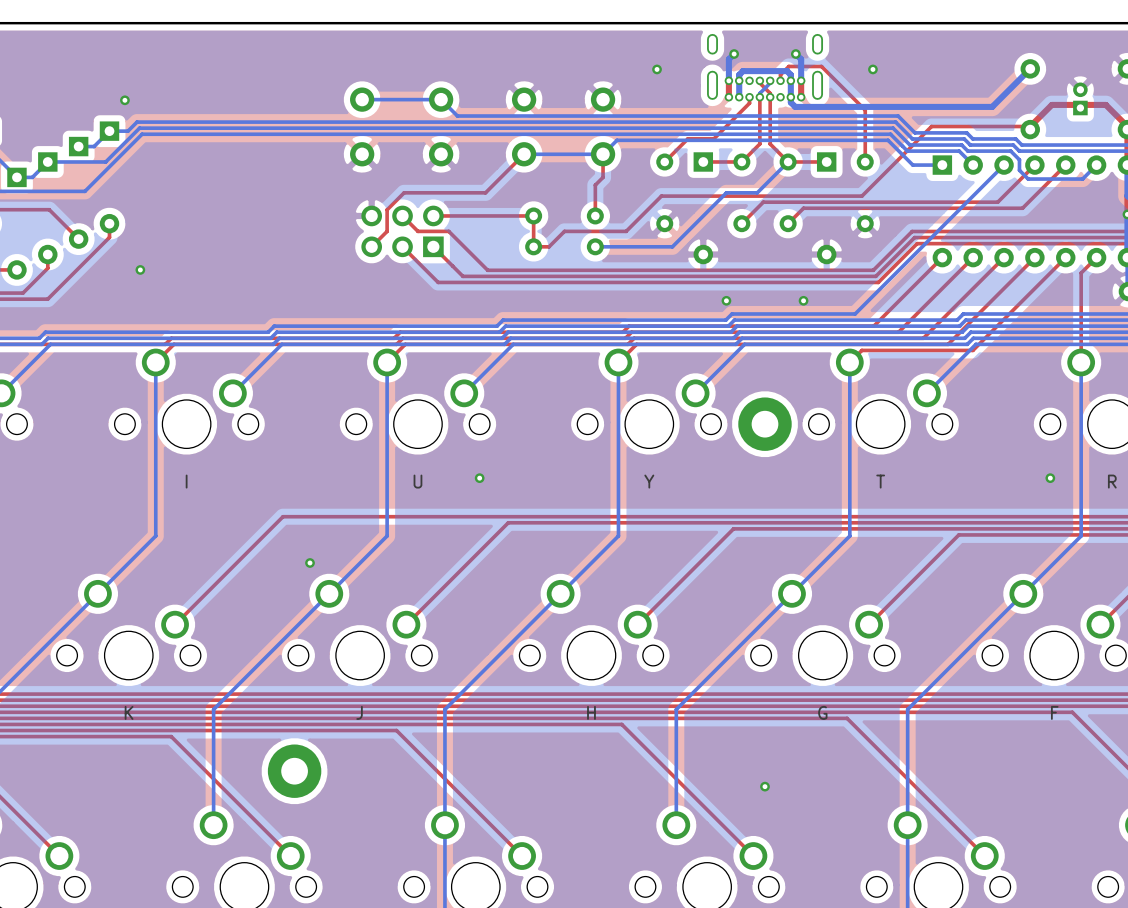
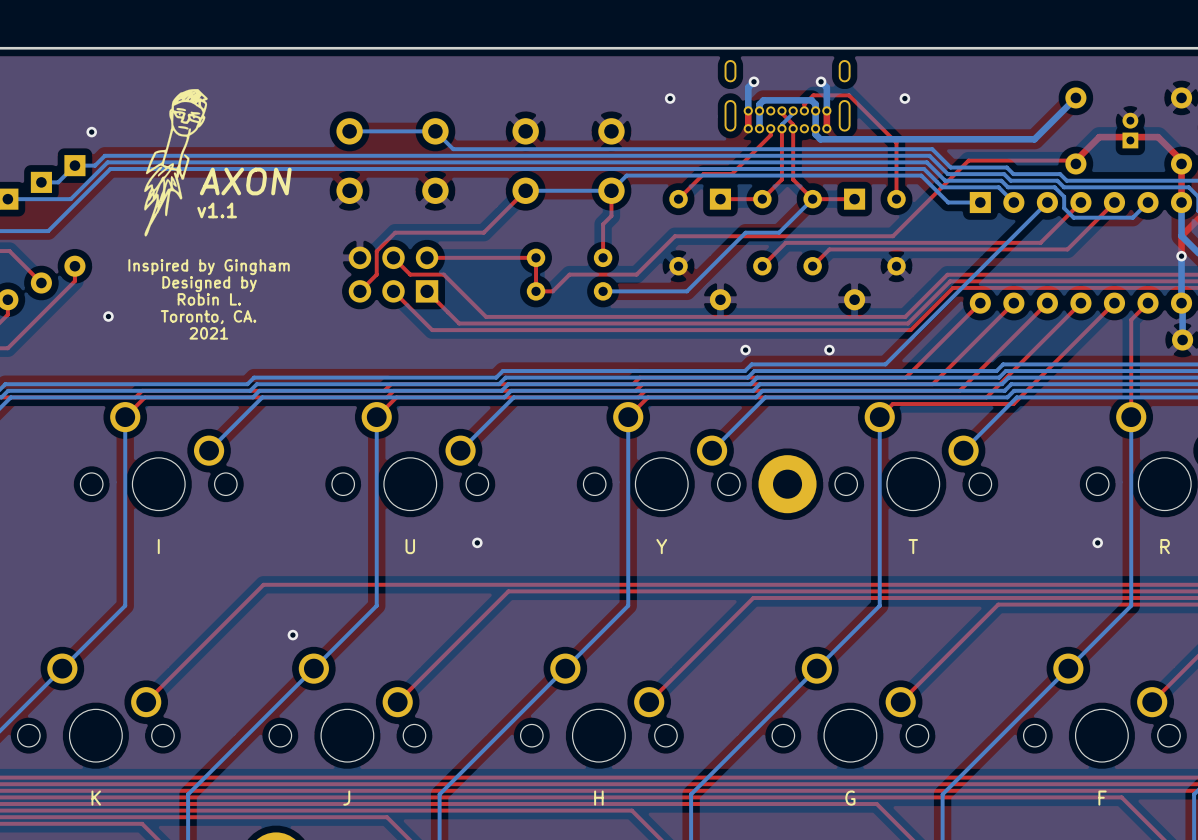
drawing: none -> [144, 89, 208, 237]
text: none -> AXON (245, 181)
text: none -> v1.1 (217, 210)
text: none -> Inspired by Gingham (209, 267)
text: none -> Designed by (209, 284)
text: none -> Robin L. (209, 299)
text: none -> Toronto, CA. (208, 317)
text: none -> 2021 (208, 333)

